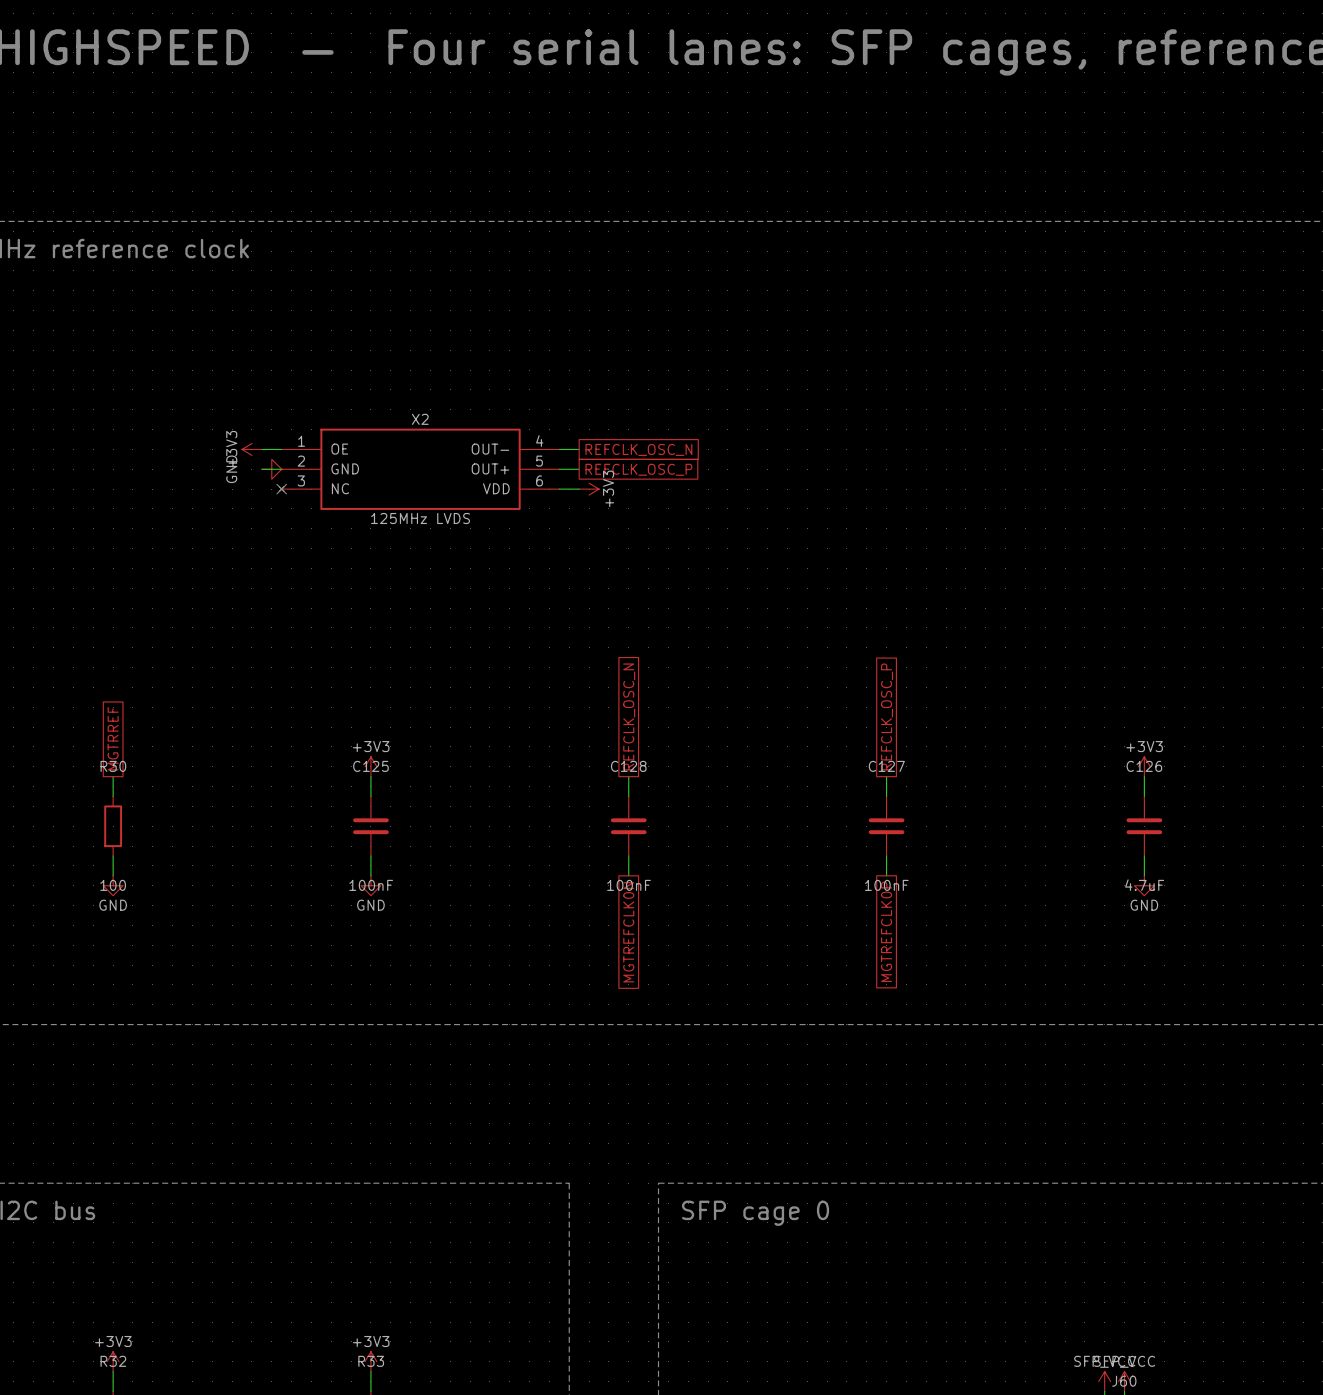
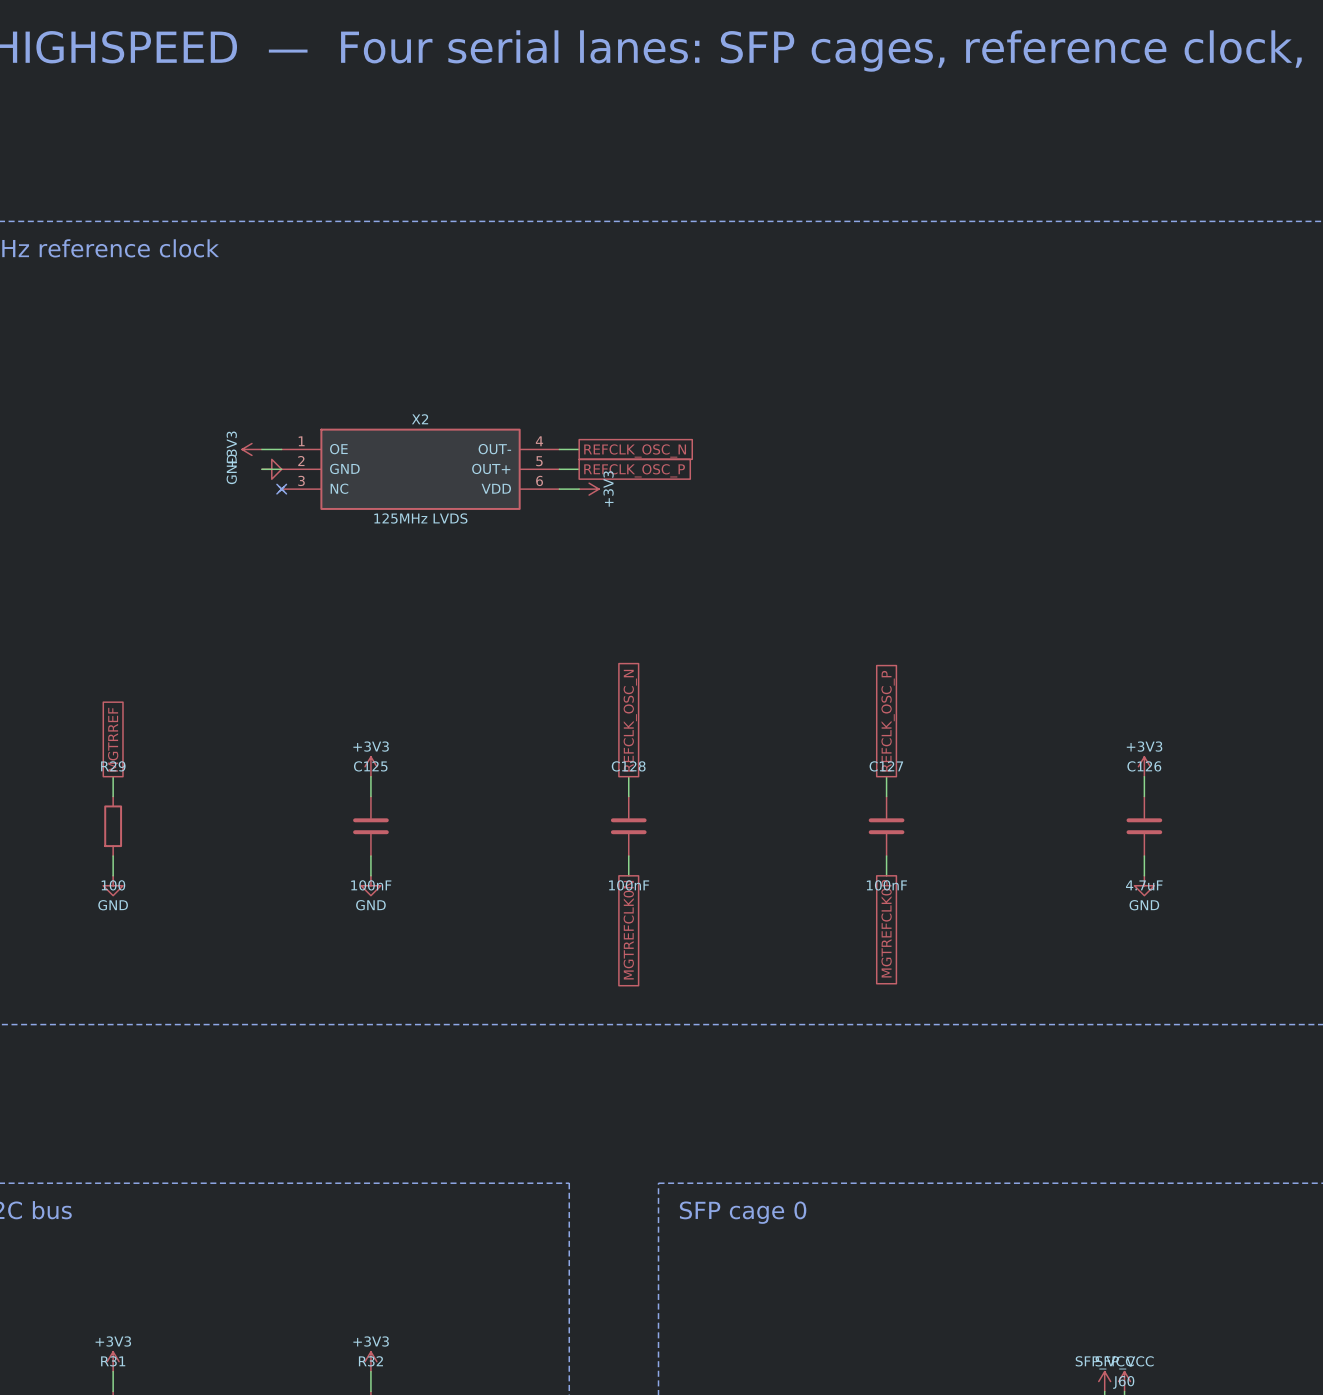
R30 name: R30 (113, 766) -> R29 (113, 766)
R32 name: R32 (113, 1361) -> R31 (113, 1361)
R33 name: R33 (371, 1361) -> R32 (370, 1361)

